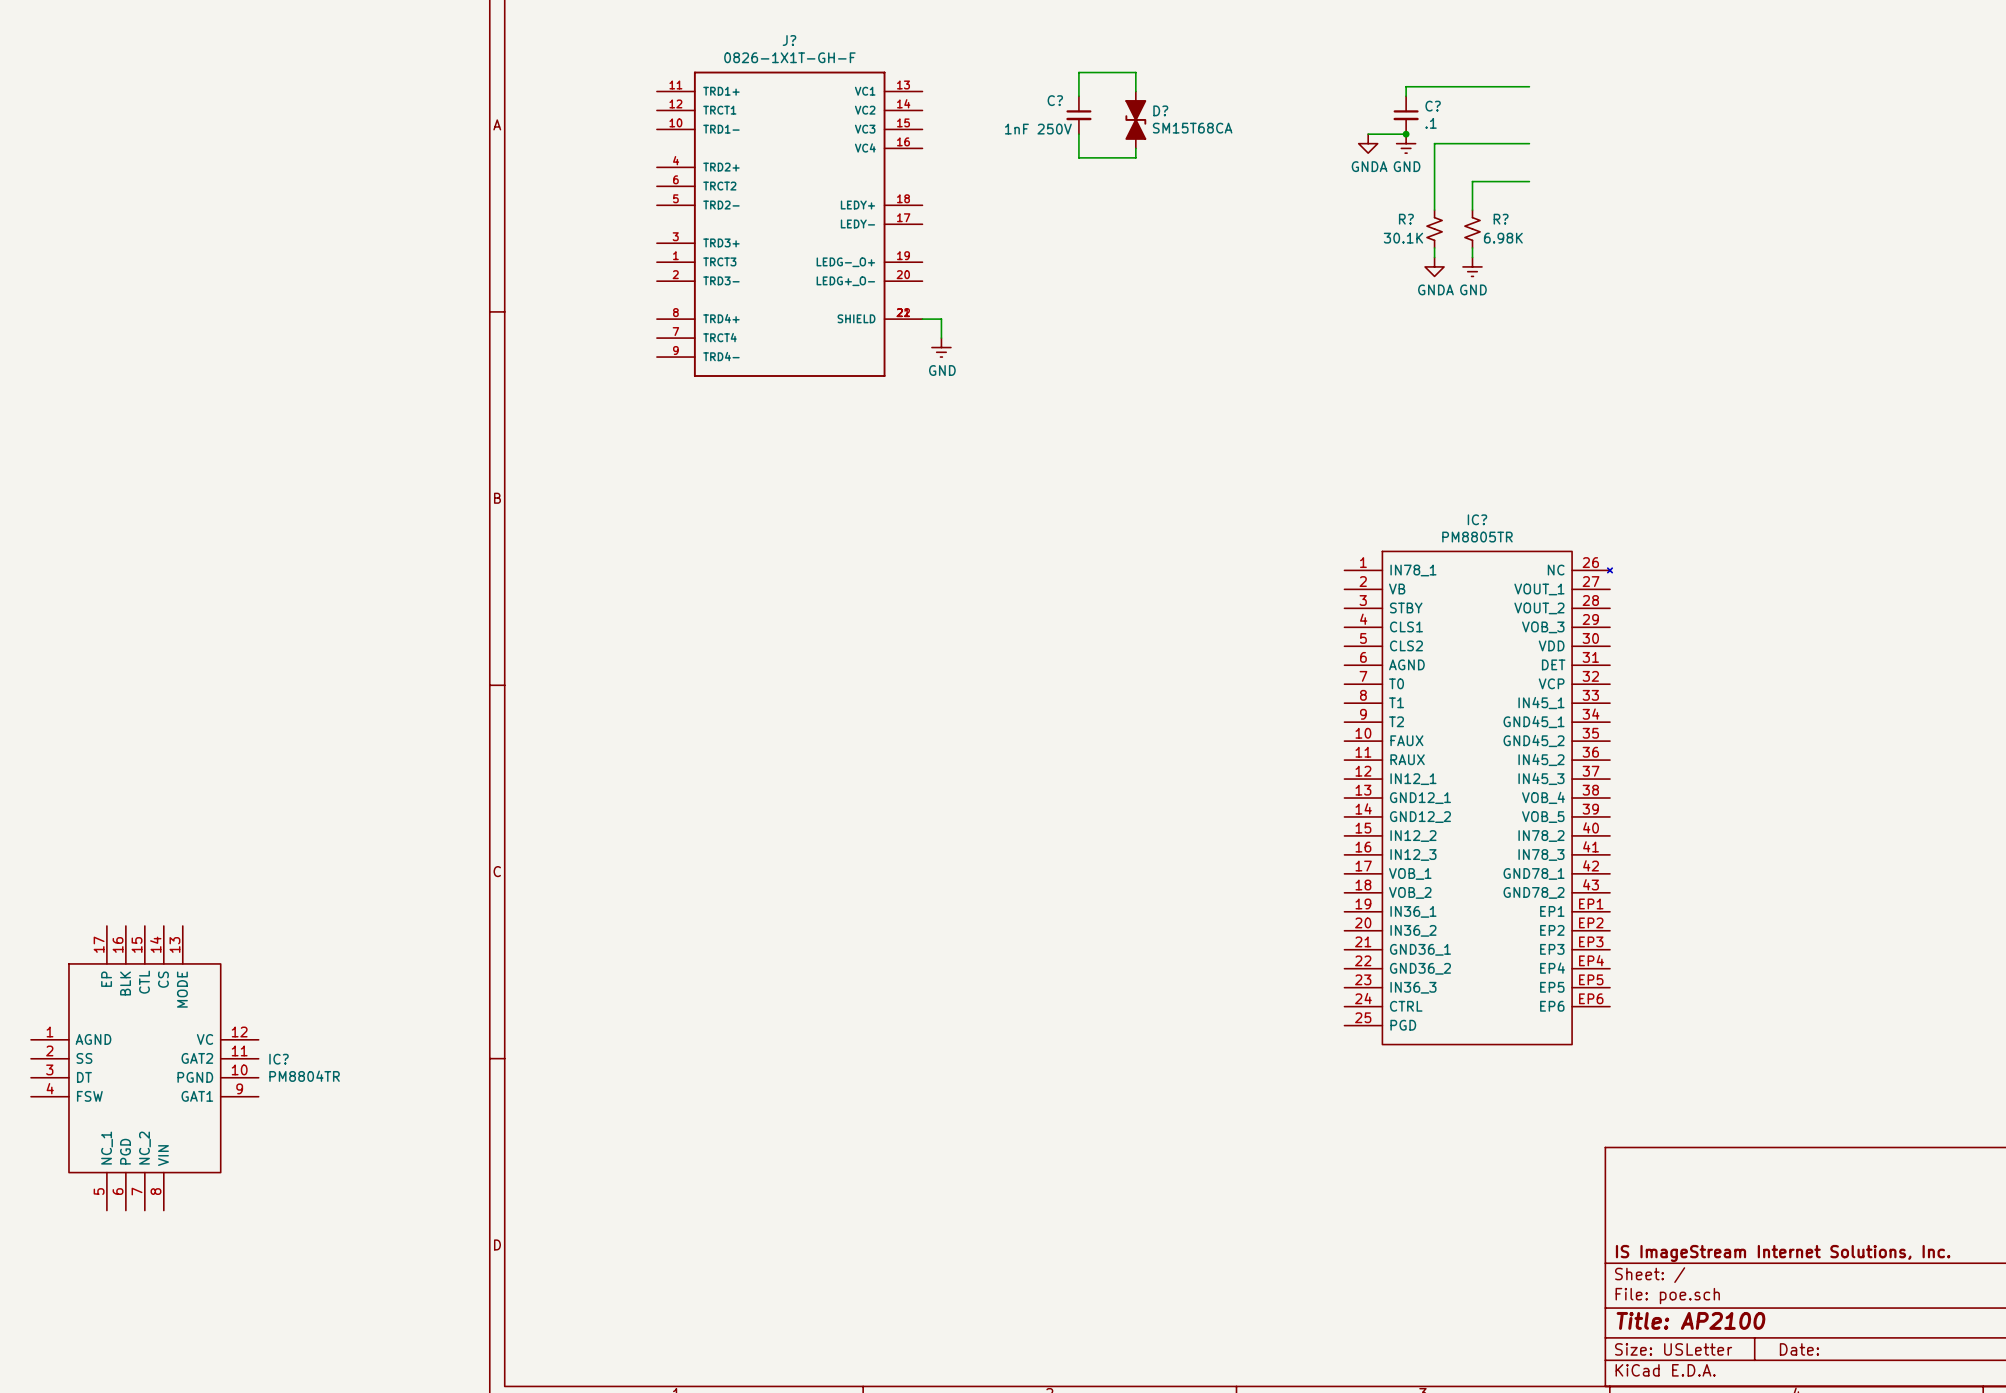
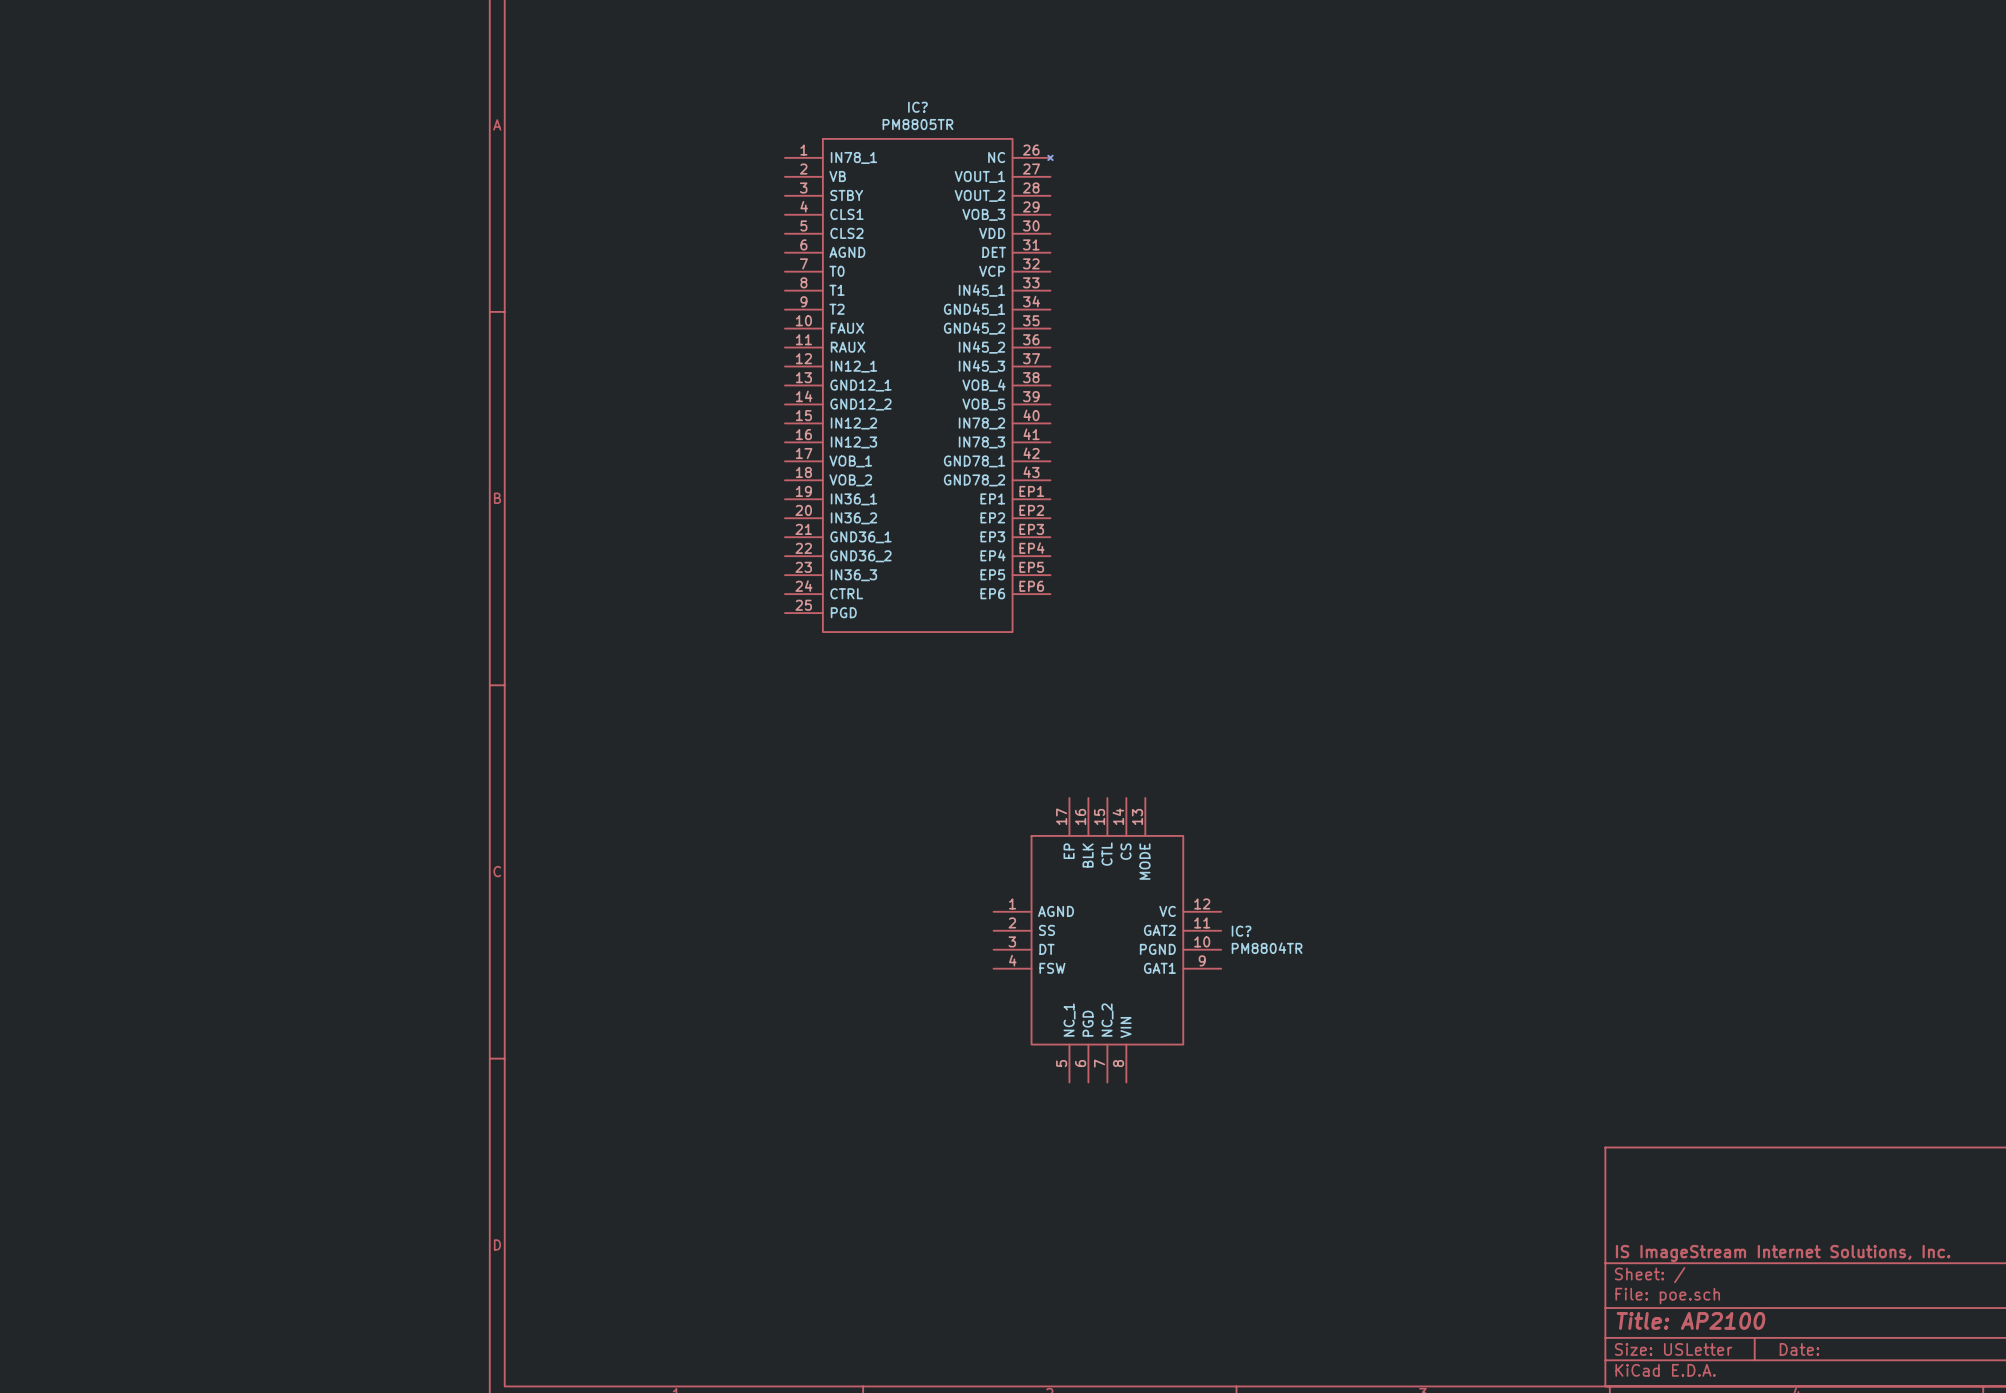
wire: (1529, 86) (1406, 86) (1406, 96) -> none
wire: (1135, 91) (1135, 72) (1078, 72) (1078, 96) -> none
C?: 1nF 250V (1078, 115) -> none
C?: .1 (1406, 115) -> none
D?: SM15T68CA (1135, 119) -> none
wire: (1078, 134) (1078, 157) (1135, 157) (1135, 148) -> none
wire: (1368, 134) (1406, 134) -> none
junction: (1406, 134) -> none
power symbol: GNDA (1368, 143) -> none
power symbol: GND (1406, 143) -> none
wire: (1529, 143) (1434, 143) (1434, 210) -> none
wire: (1529, 181) (1472, 181) (1472, 210) -> none
J?: 0826-1X1T-GH-F (789, 224) -> none
R?: 30.1K (1434, 229) -> none
R?: 6.98K (1472, 229) -> none
wire: (1434, 247) (1434, 257) -> none
wire: (1472, 247) (1472, 257) -> none
power symbol: GNDA (1434, 266) -> none
power symbol: GND (1472, 266) -> none
wire: (922, 319) (941, 319) (941, 338) -> none
power symbol: GND (941, 347) -> none
IC?: none -> PM8805TR (918, 385)
IC?: PM8805TR (1478, 798) -> none
IC?: none -> PM8804TR (1107, 940)
IC?: PM8804TR (144, 1068) -> none

